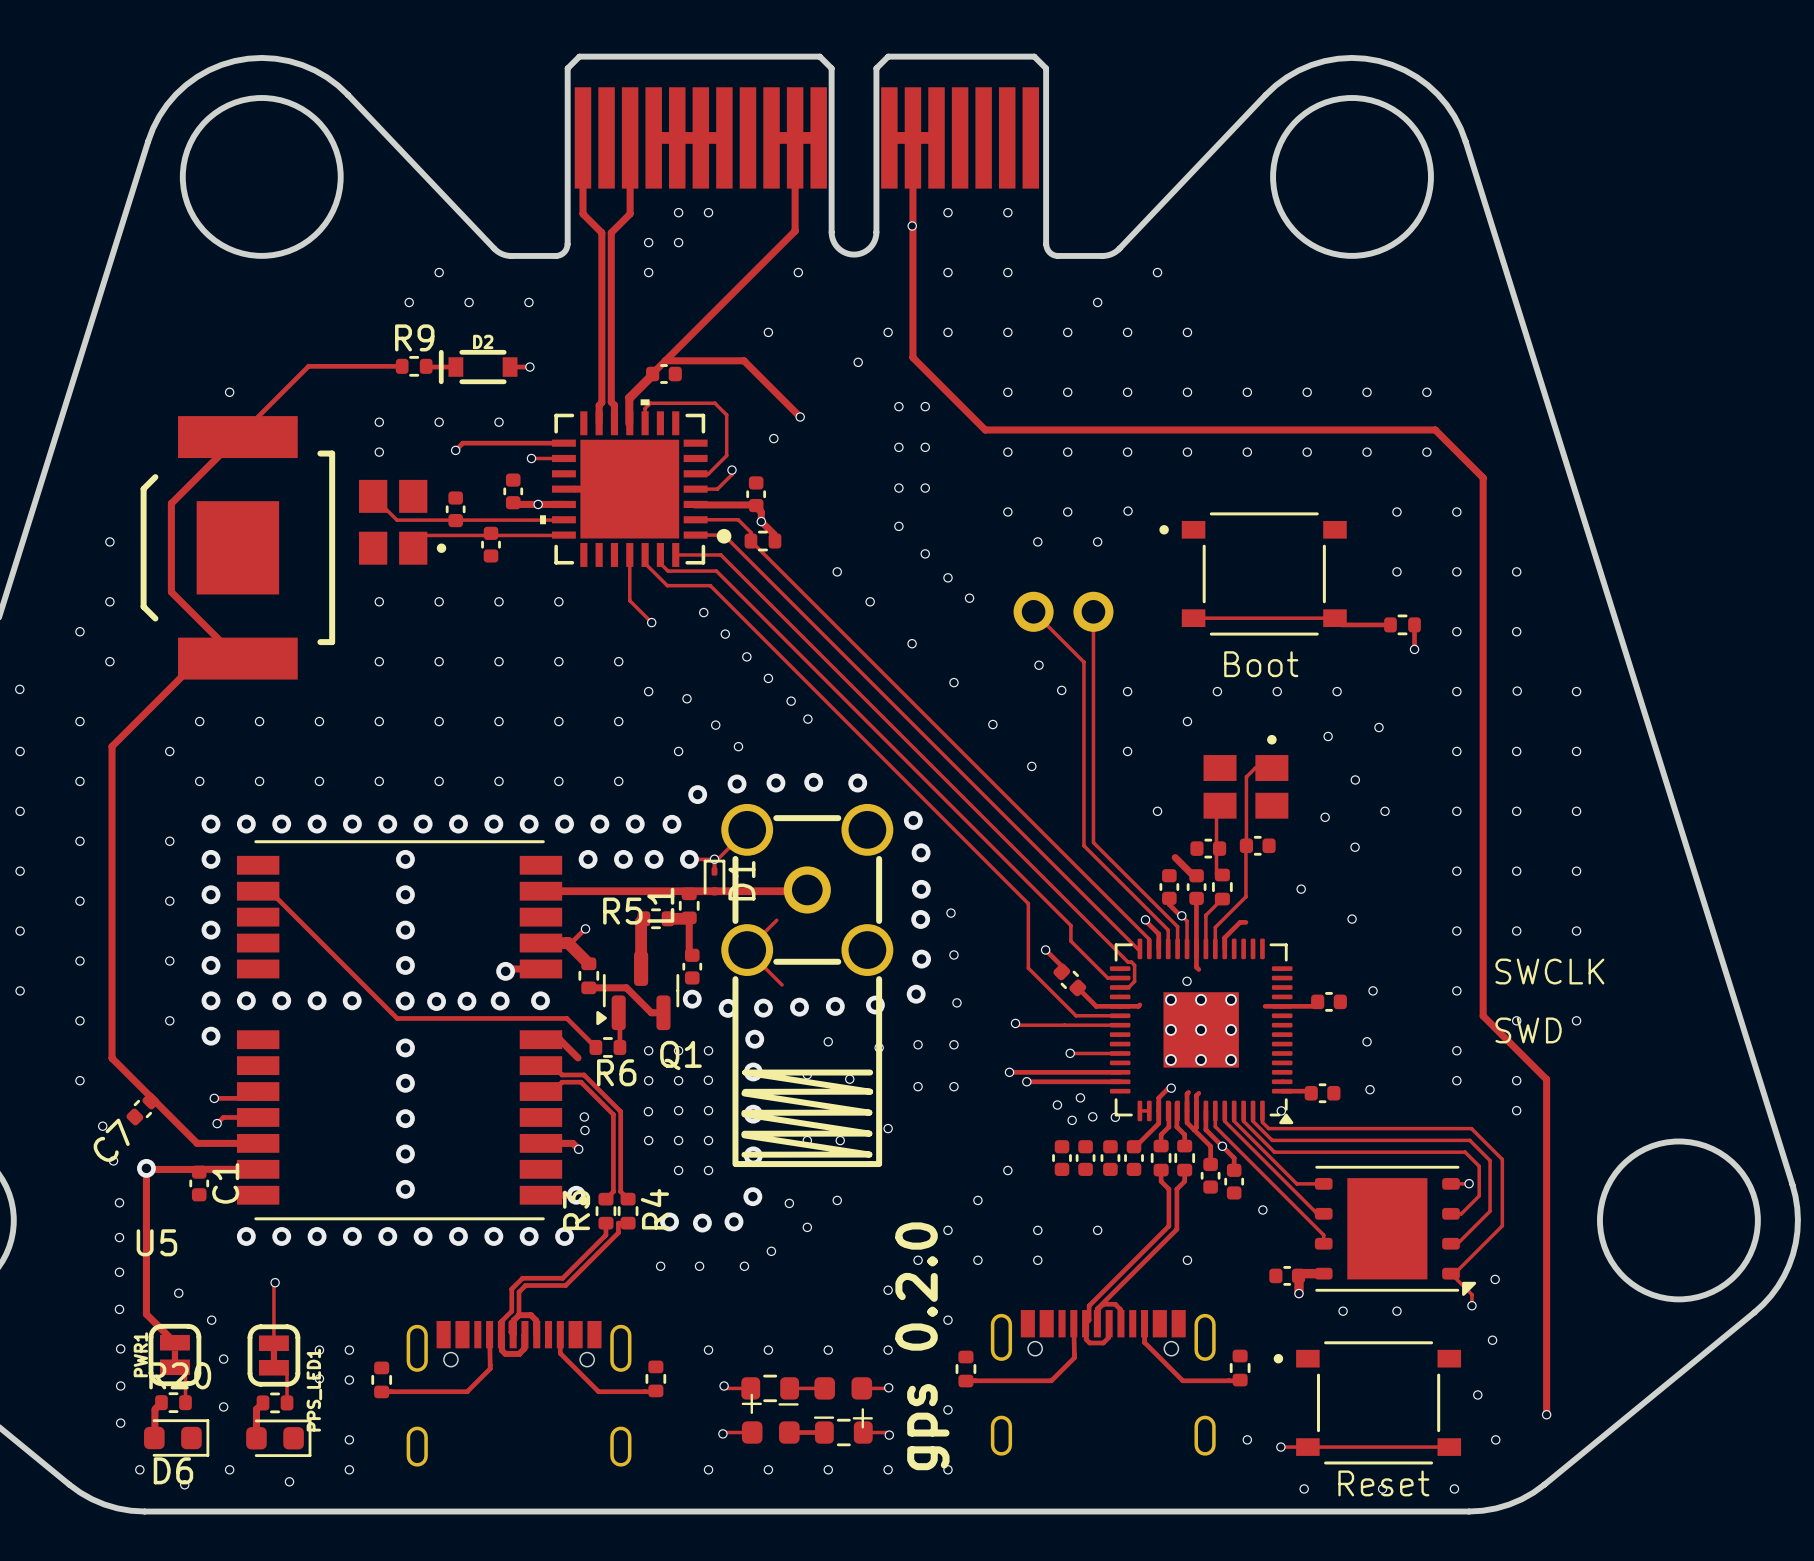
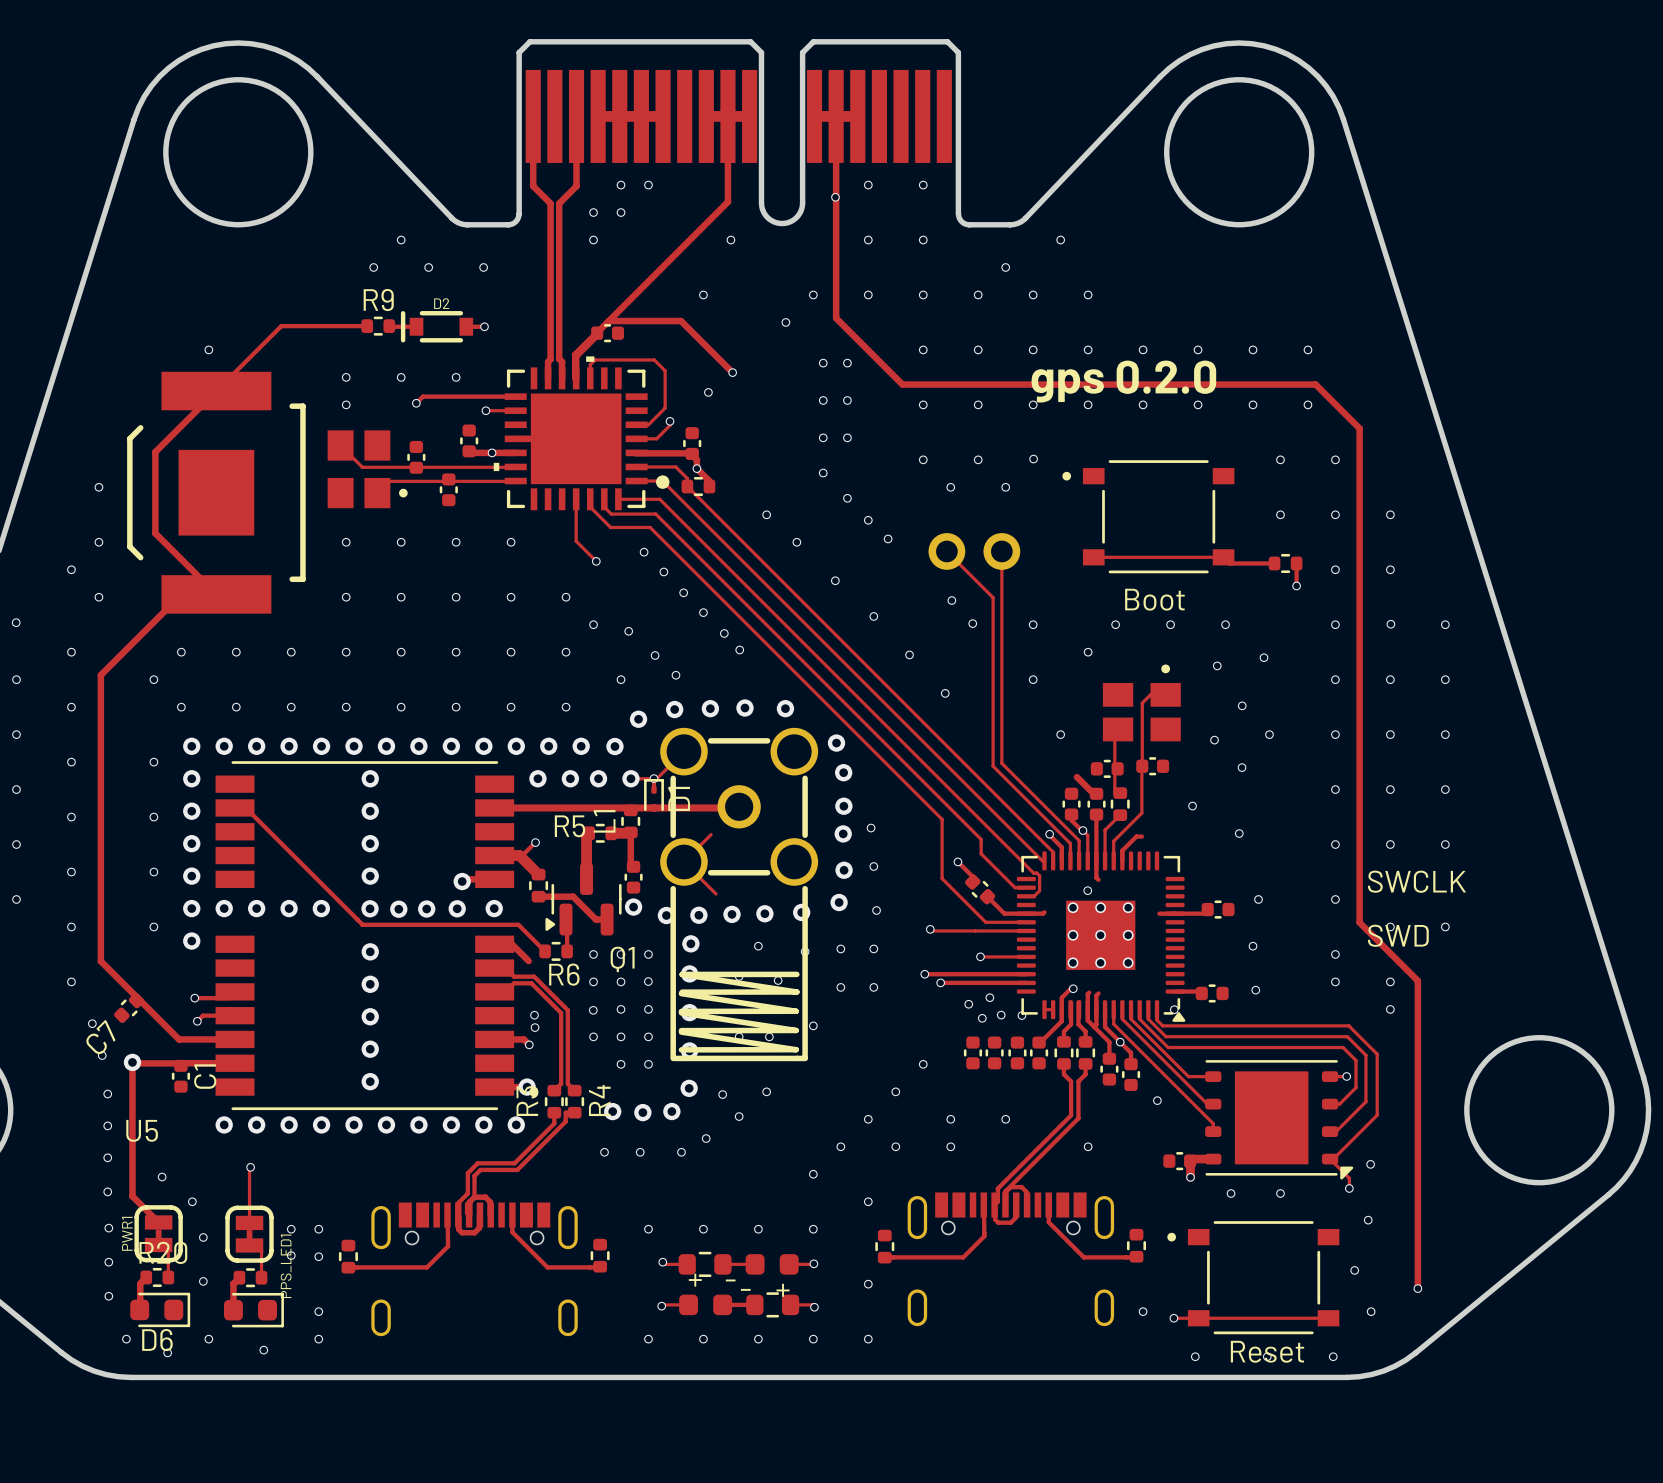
text: none -> gps 0.2.0 (1123, 381)
text: gps 0.2.0 (922, 1346) -> none

